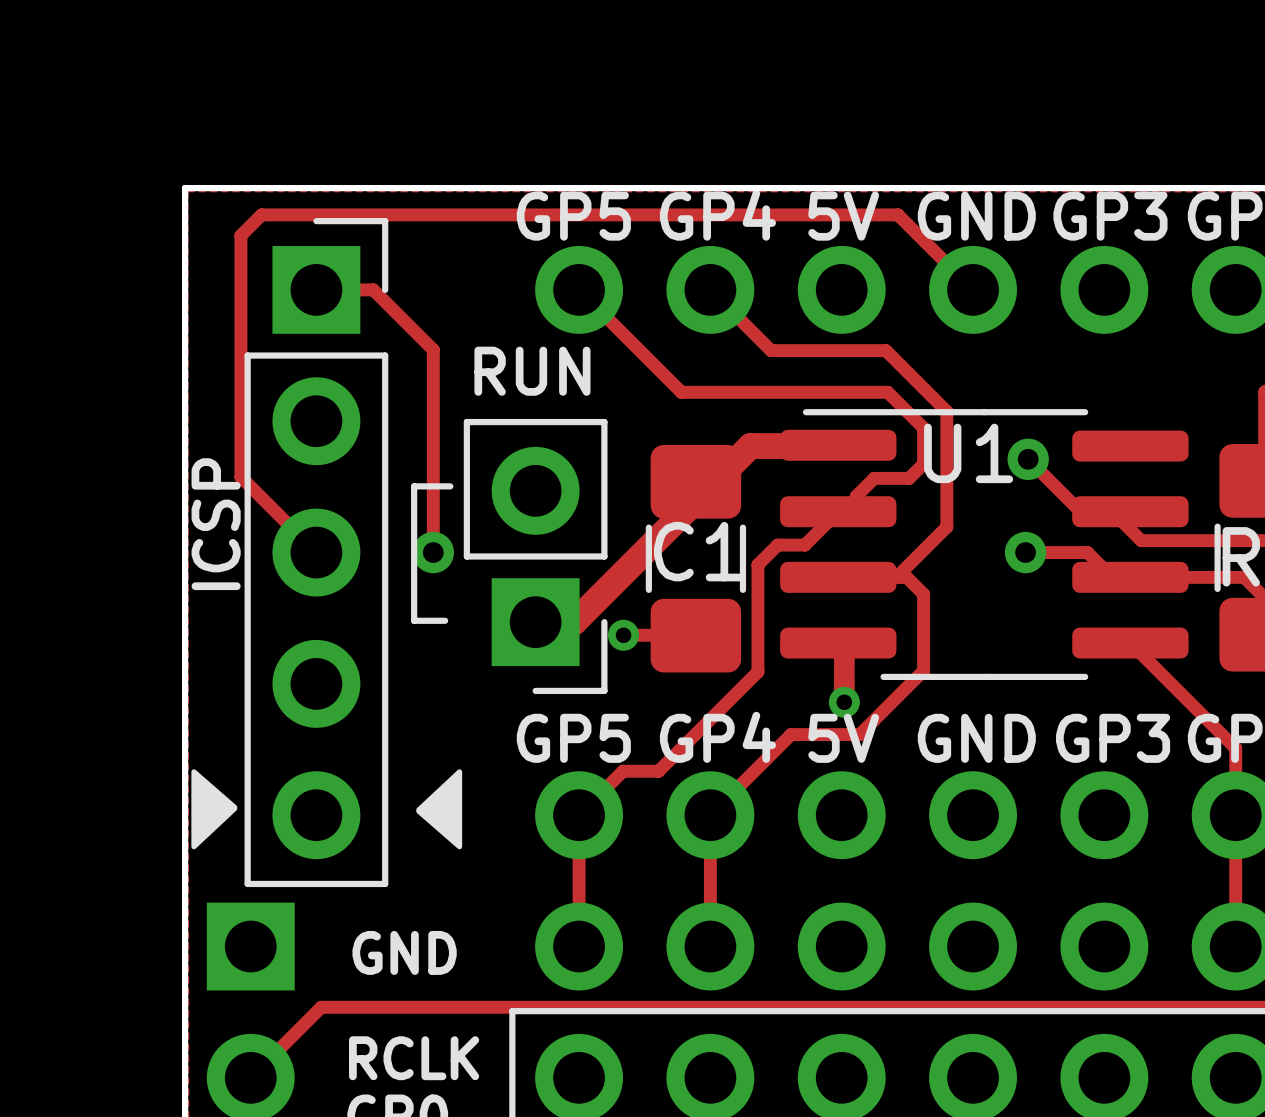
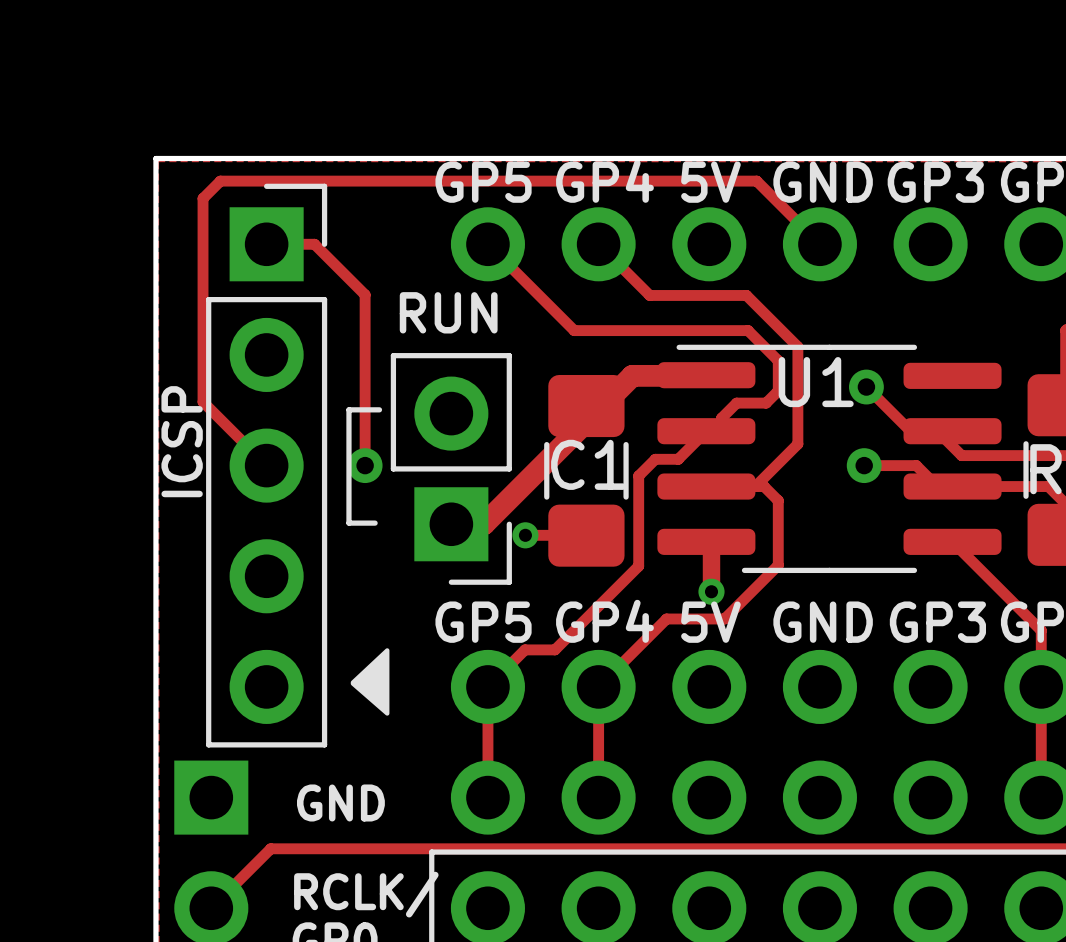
drawing: [191, 769, 238, 850] -> none
text: RCLK (414, 1058) -> RCLK/ (366, 894)

